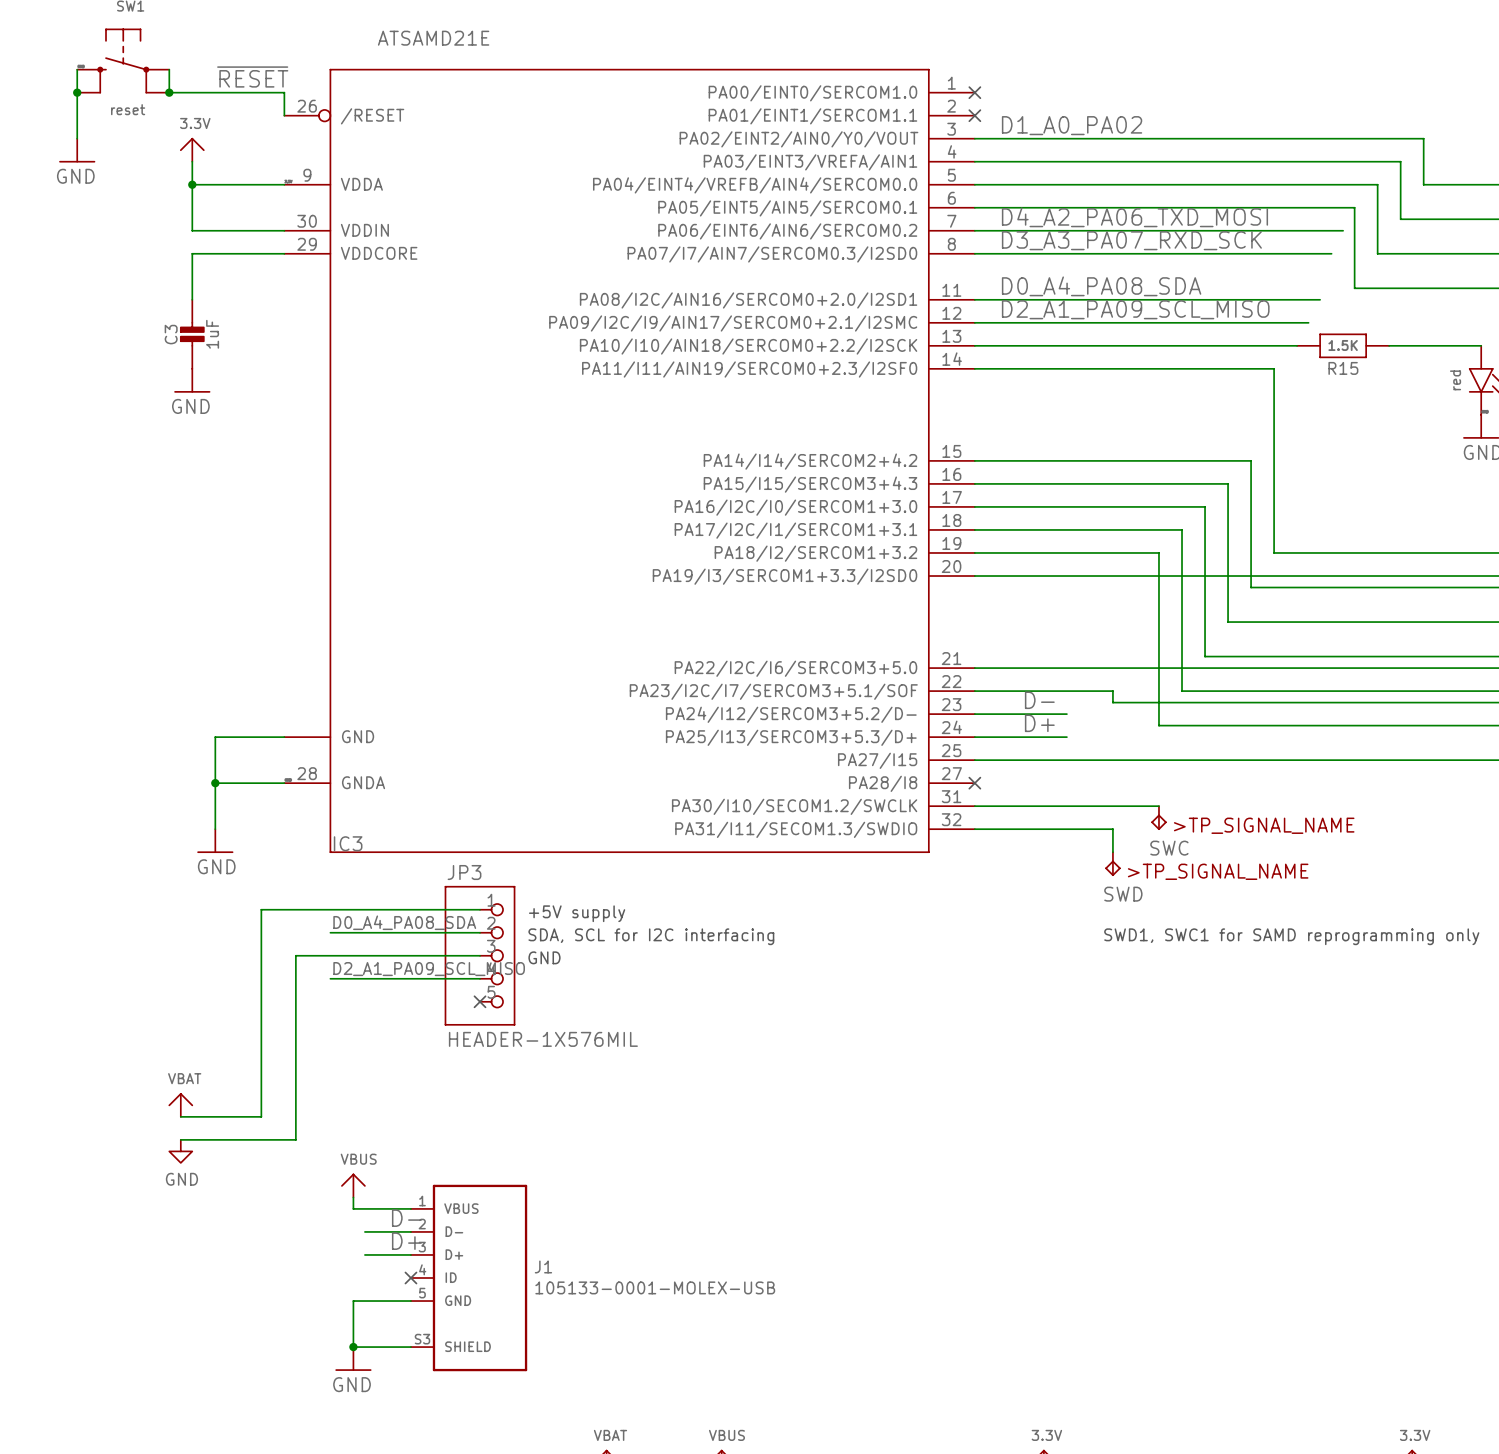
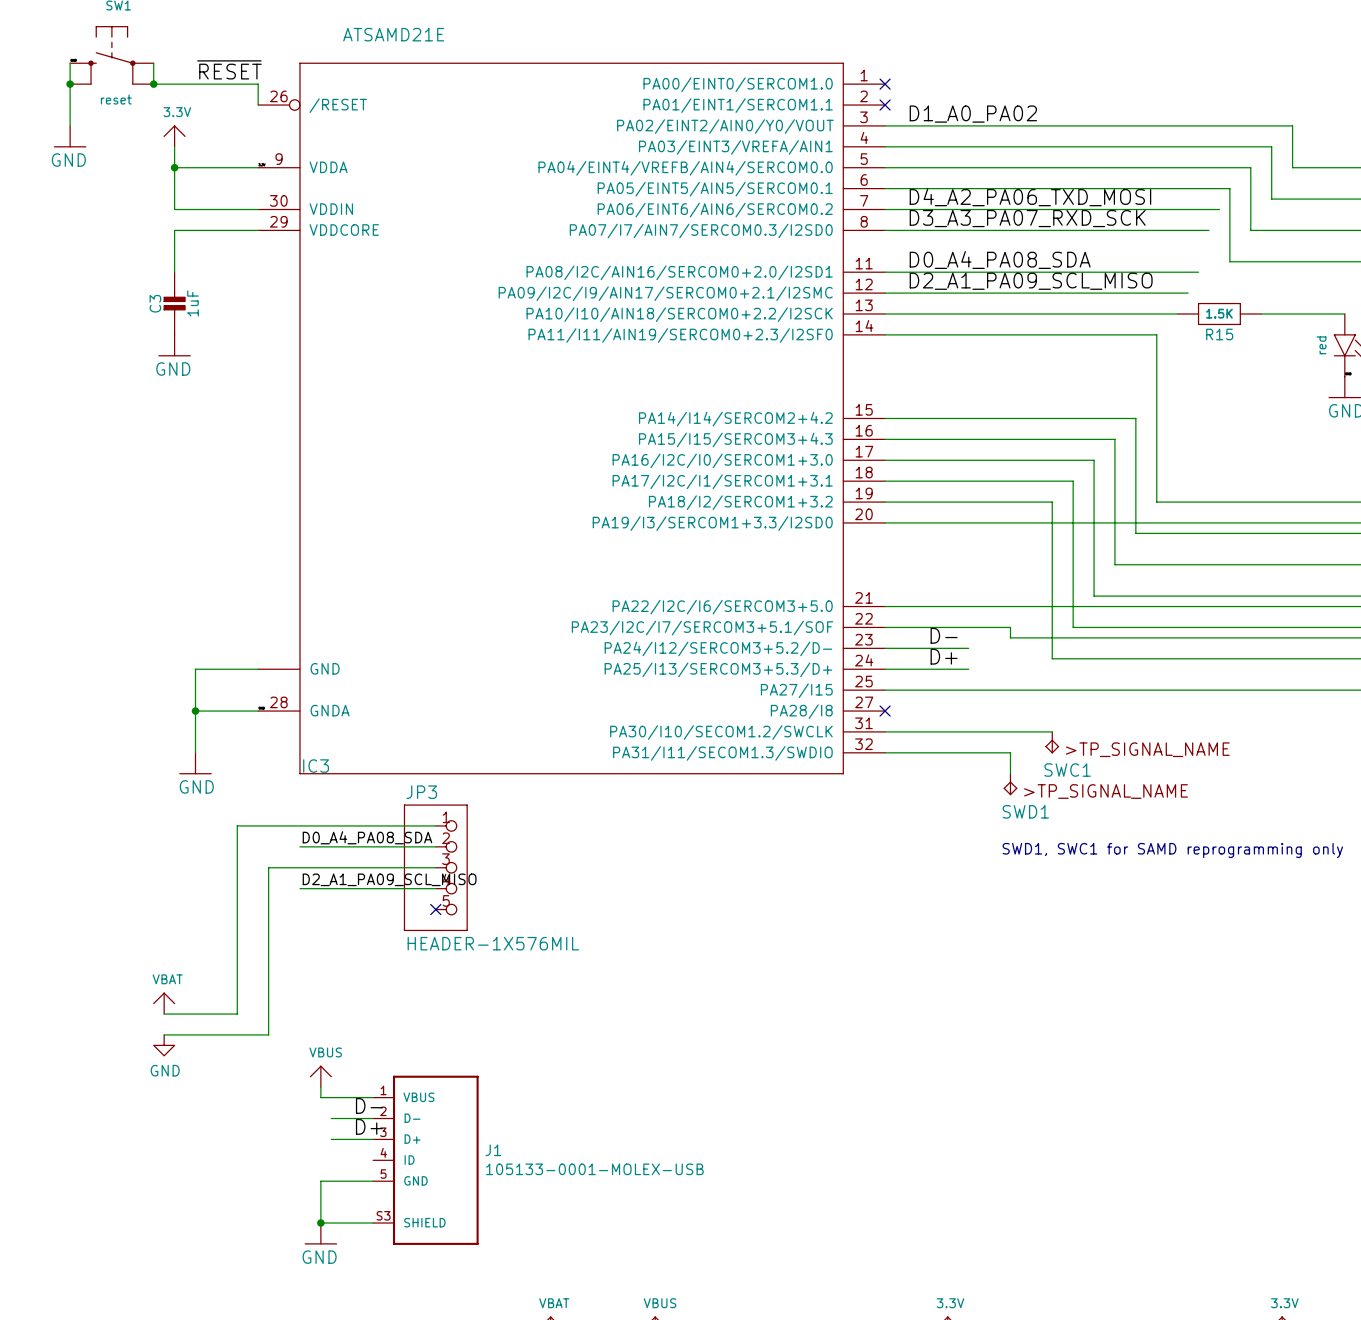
SWC name: SWC (1169, 848) -> SWC1 (1067, 770)
SWD name: SWD (1123, 894) -> SWD1 (1025, 811)
text: +5V supply (577, 913) -> none
text: SDA, SCL for I2C interfacing (651, 936) -> none
text: GND (544, 957) -> none
no-connect mark: (410, 1277) -> none

